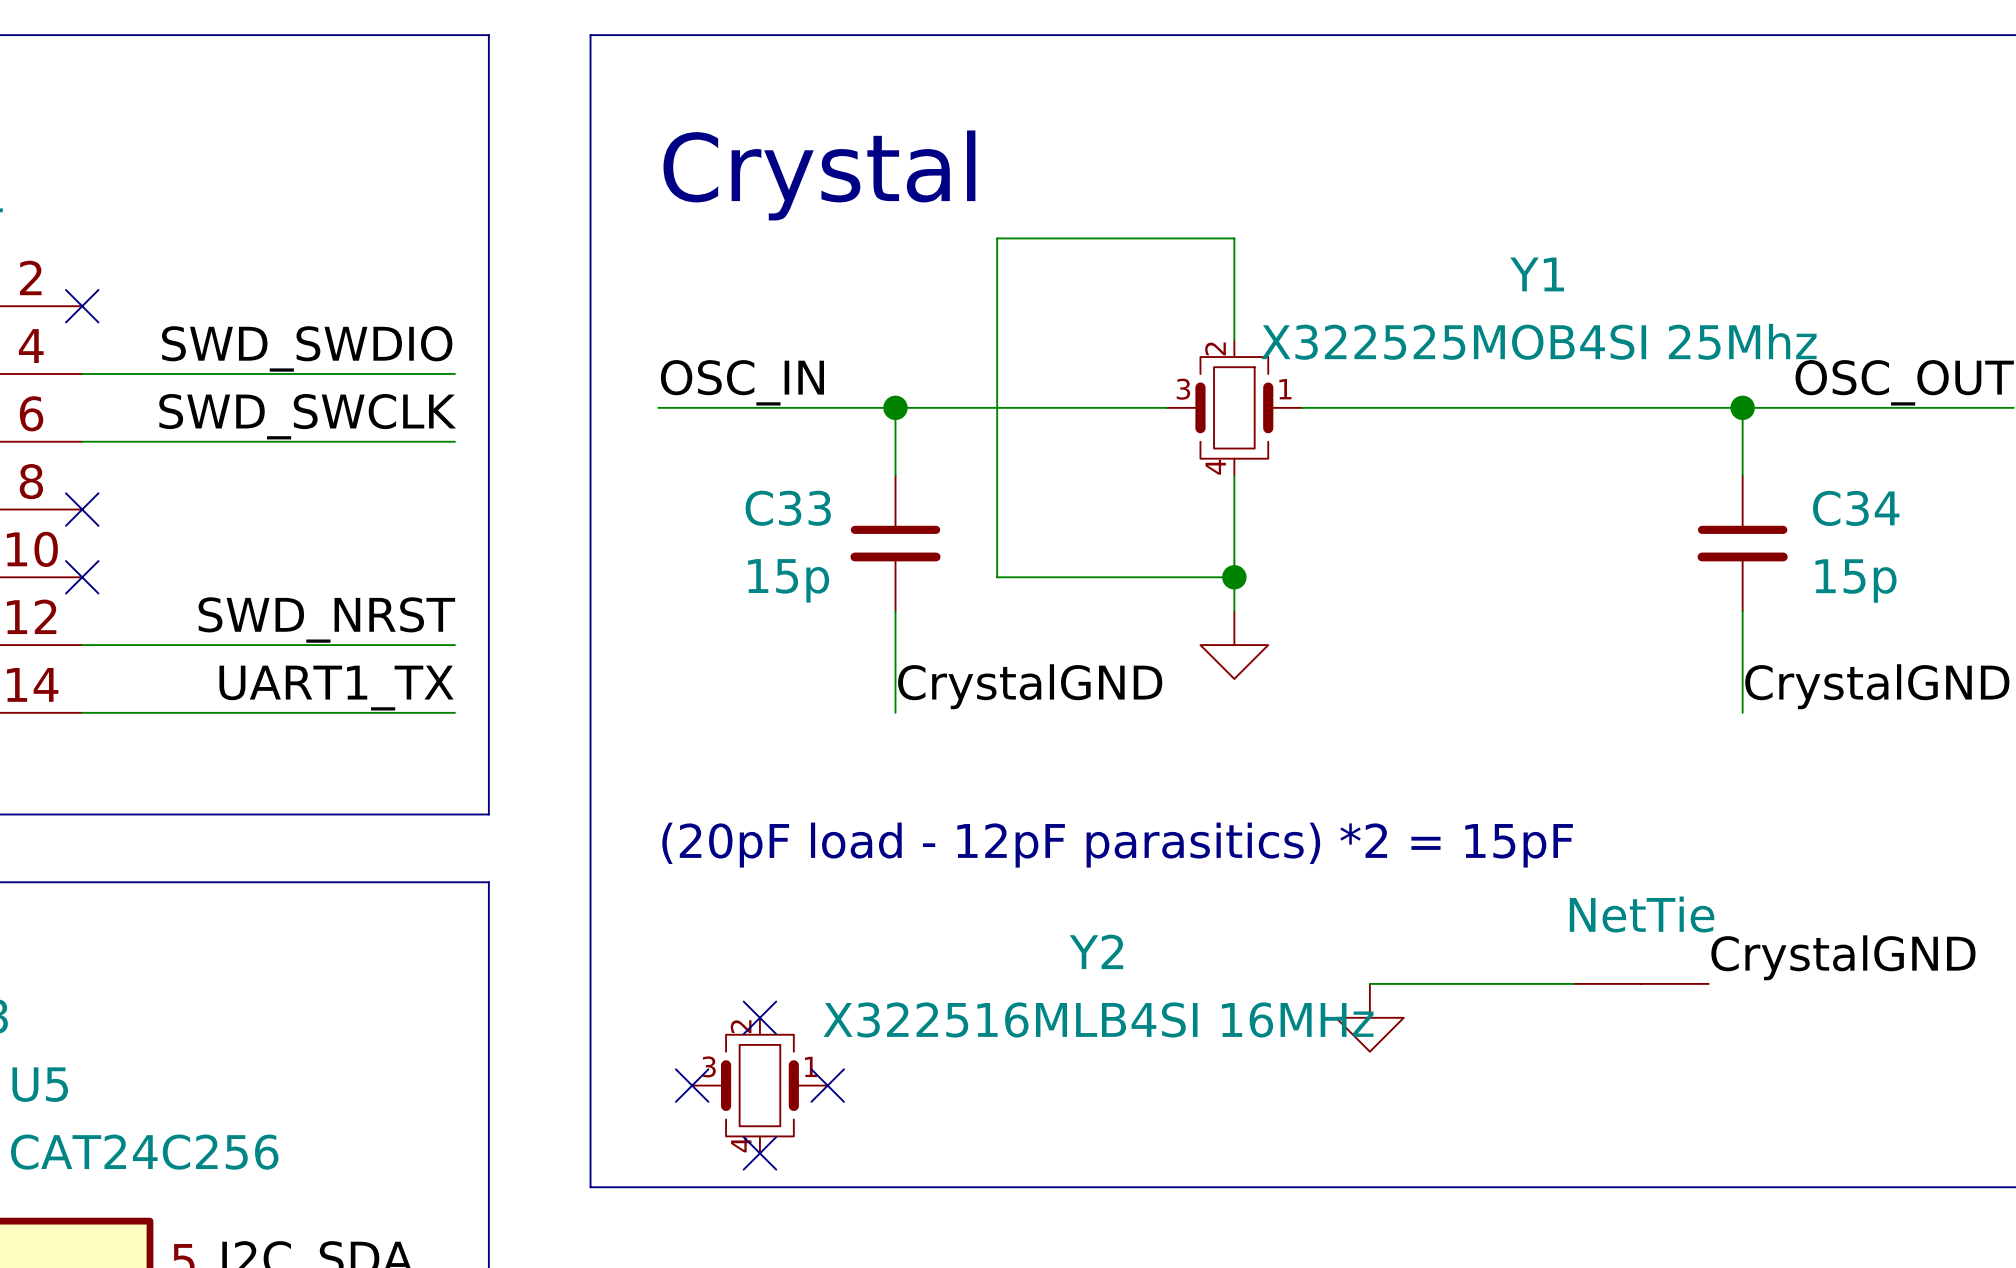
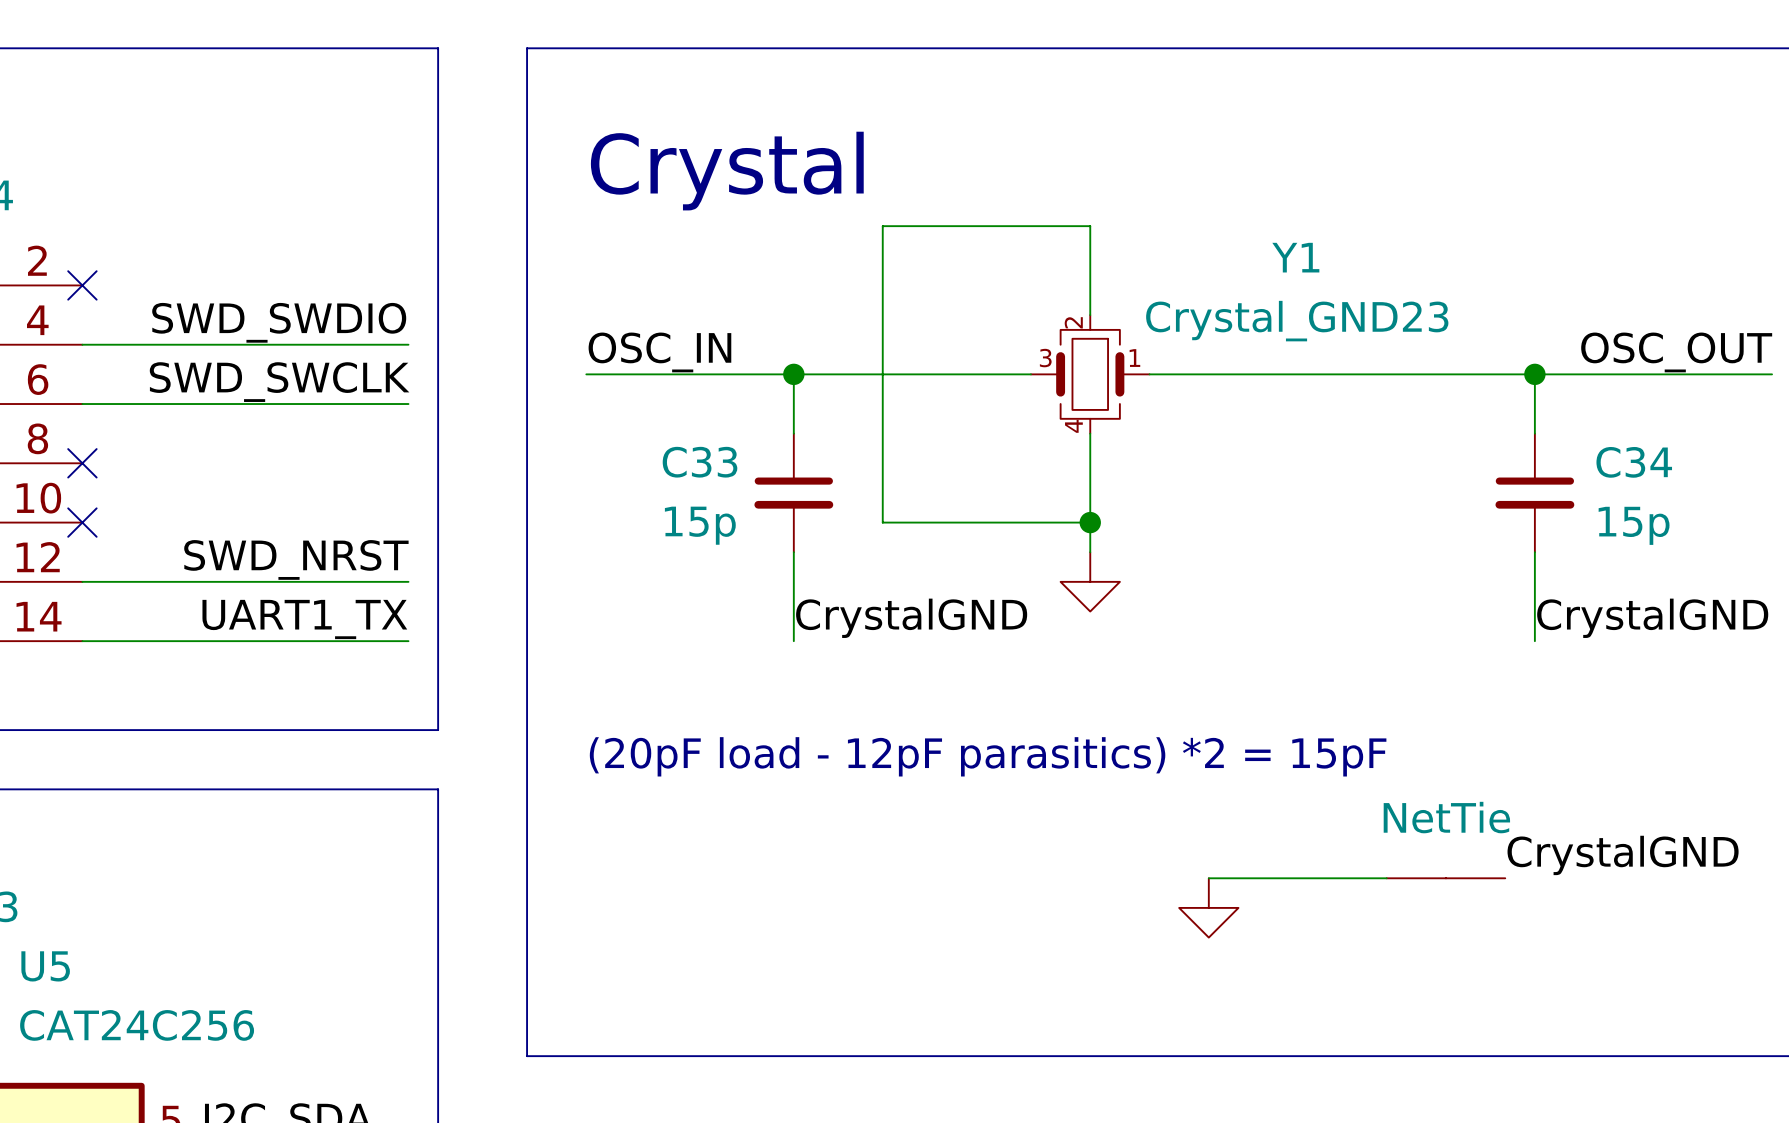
Y1 name position: Y1 (1537, 274) -> Y1 (1295, 257)
Y1 value: X322525MOB4SI 25Mhz (1539, 341) -> Crystal_GND23 (1297, 321)
no-connect mark: (759, 1017) -> none
no-connect mark: (692, 1085) -> none
Y2: X322516MLB4SI 16MHz (759, 1085) -> none
no-connect mark: (827, 1085) -> none
no-connect mark: (759, 1153) -> none

